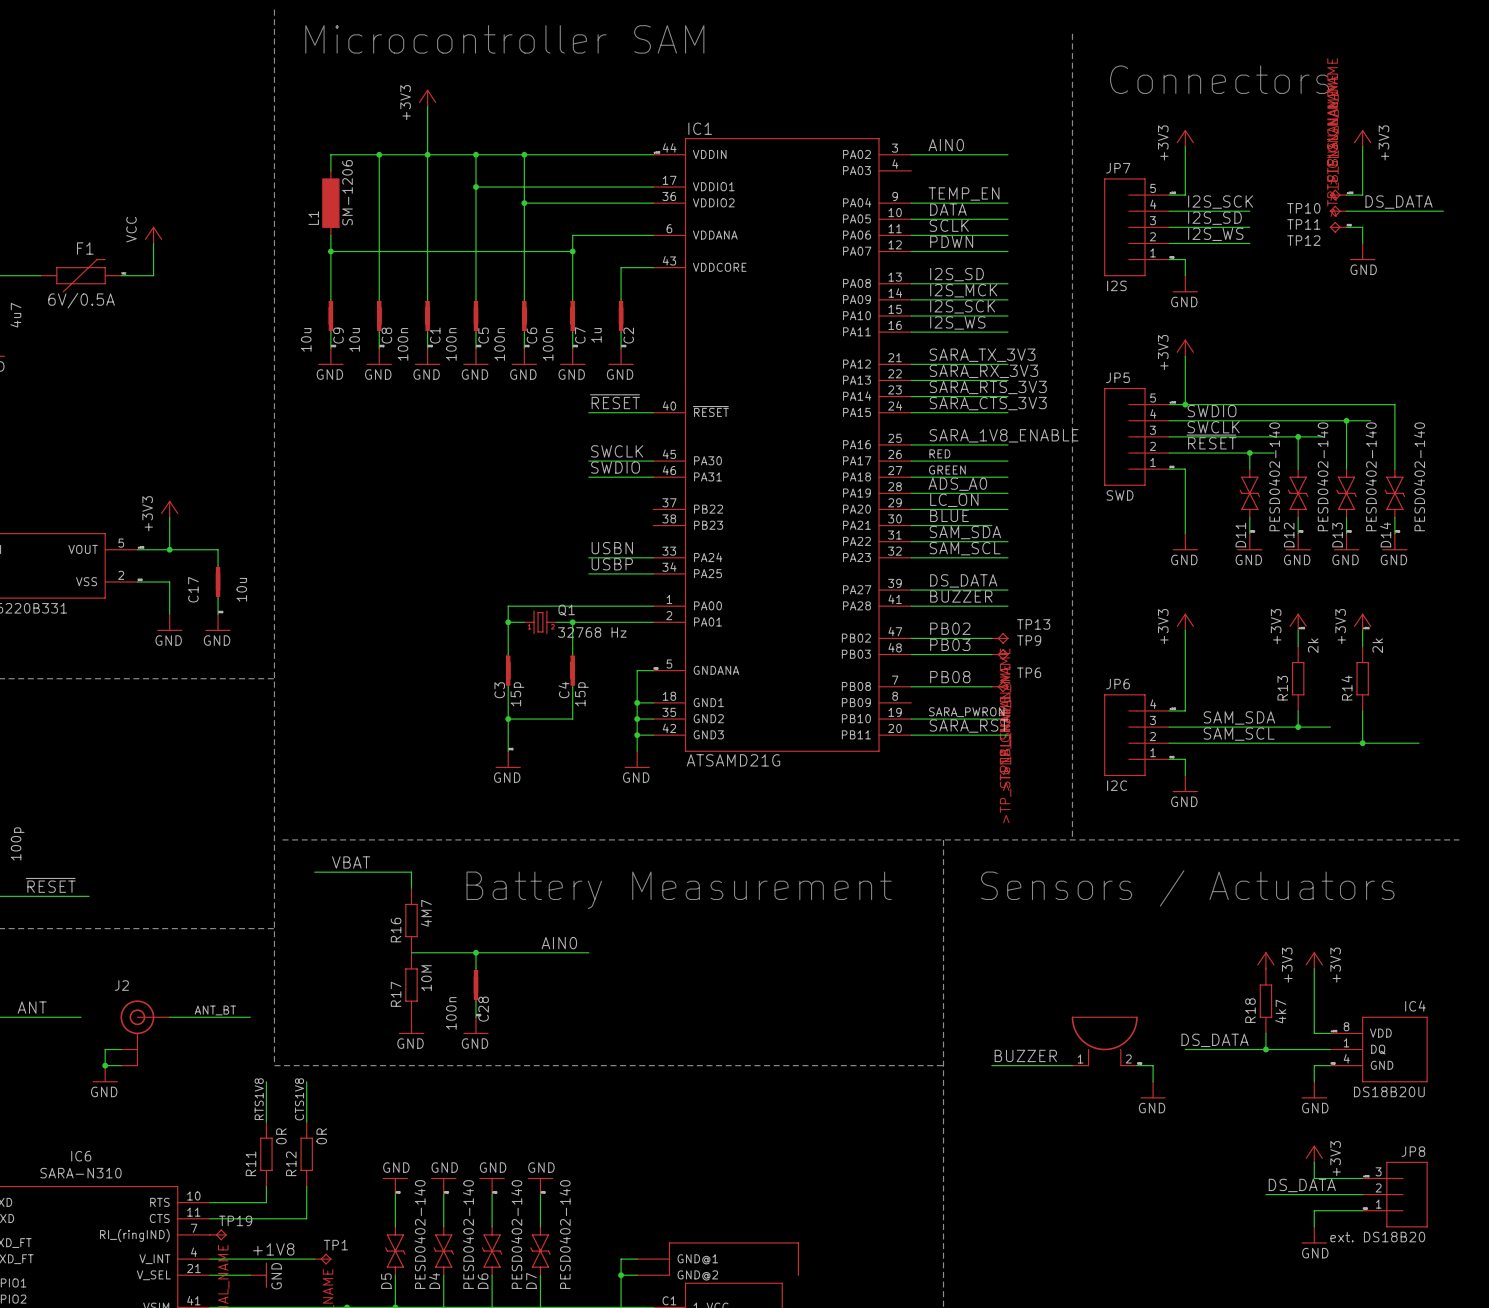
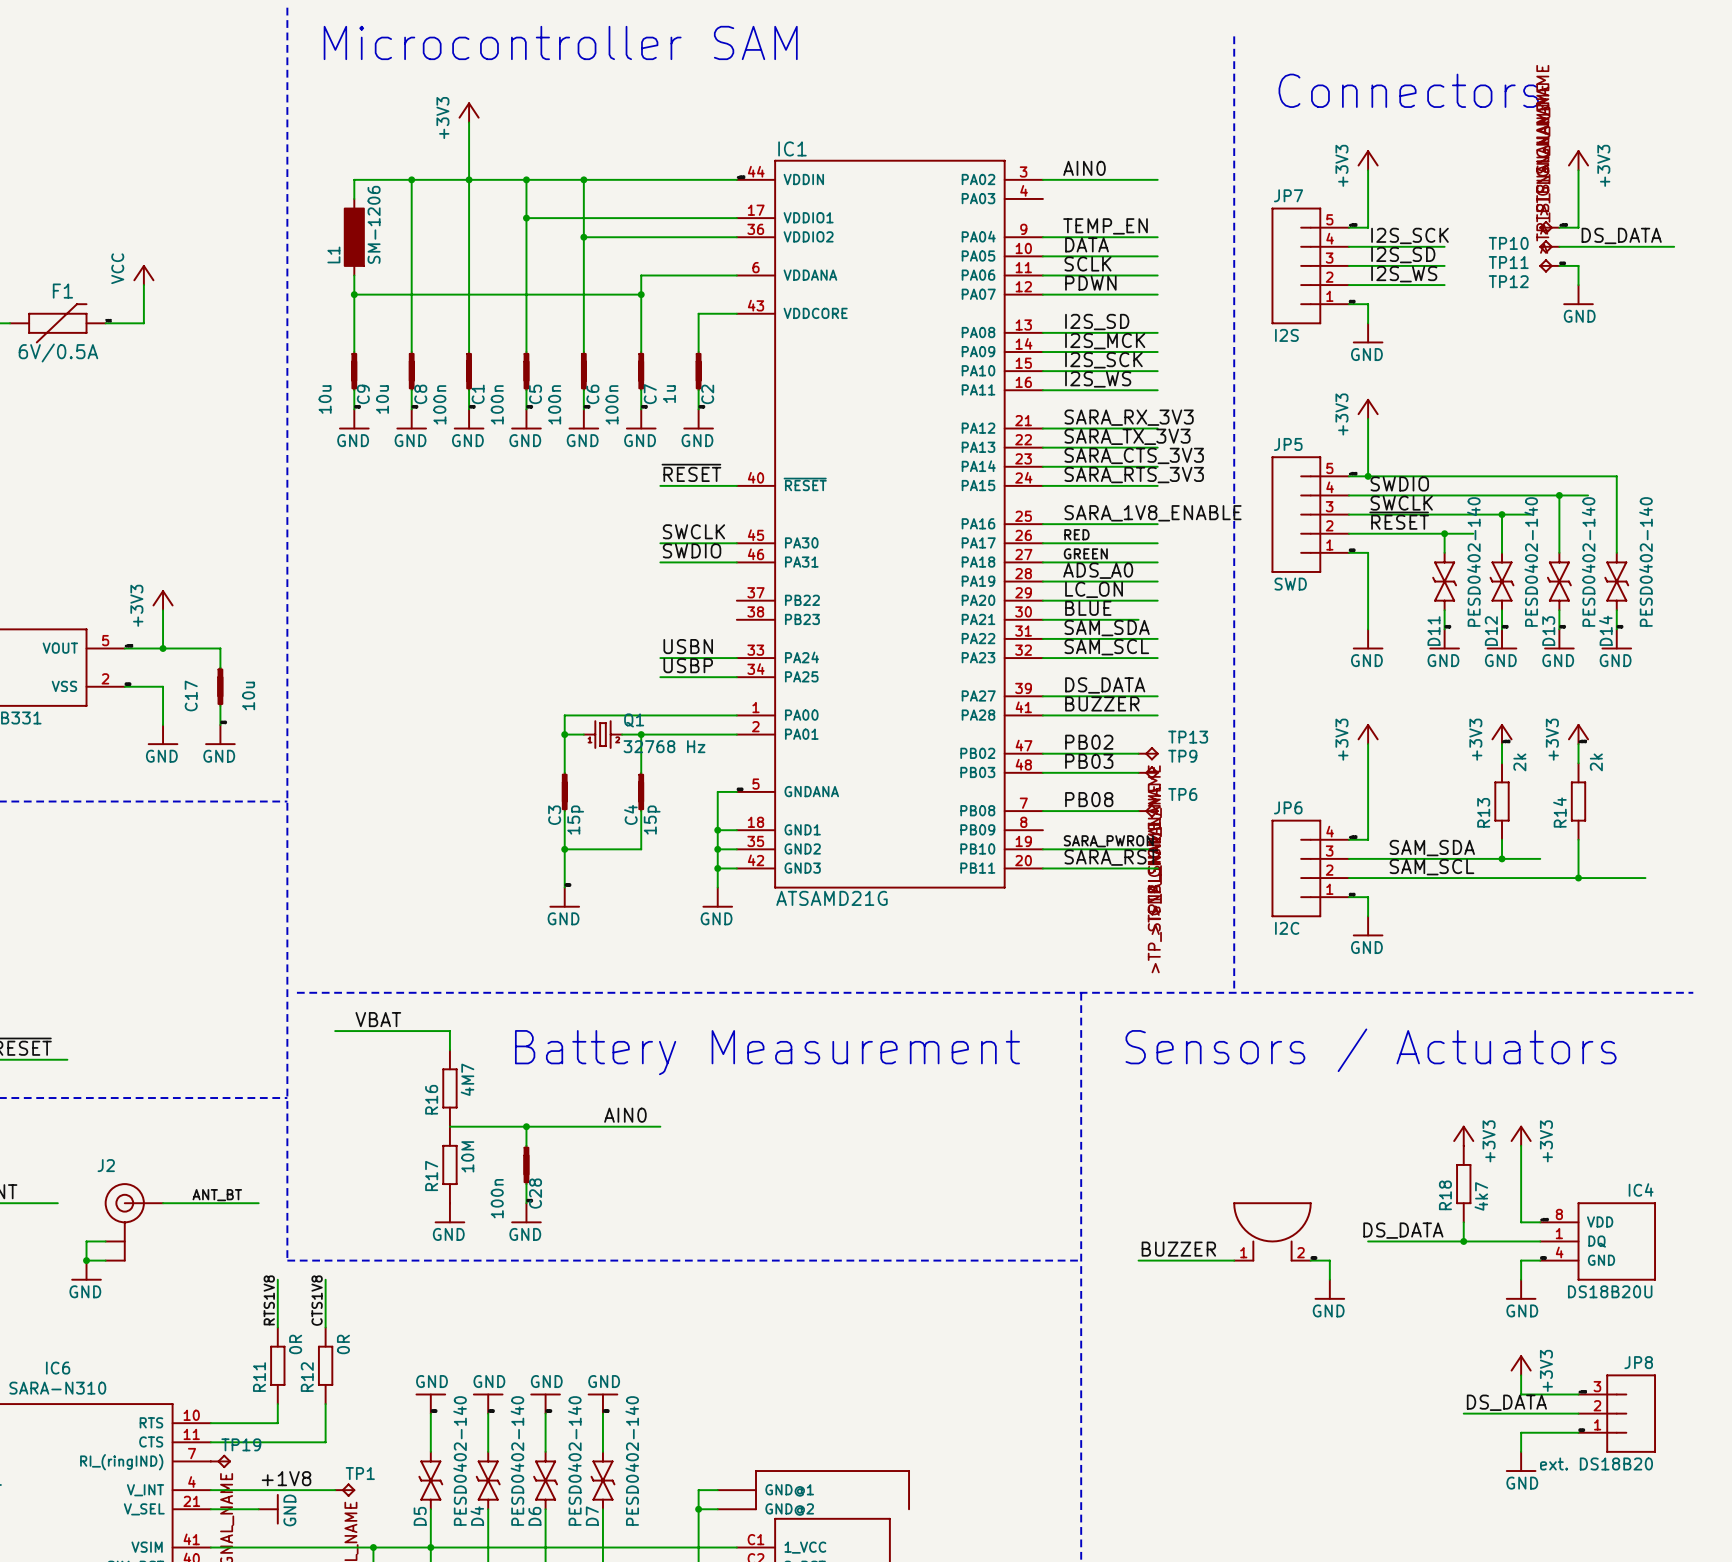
label: SARA_TX_3V3 (982, 355) -> SARA_RX_3V3 (1129, 417)
label: SARA_RX_3V3 (983, 371) -> SARA_TX_3V3 (1127, 436)
label: SARA_RTS_3V3 (988, 387) -> SARA_CTS_3V3 (1134, 455)
label: SARA_CTS_3V3 (988, 403) -> SARA_RTS_3V3 (1134, 475)

